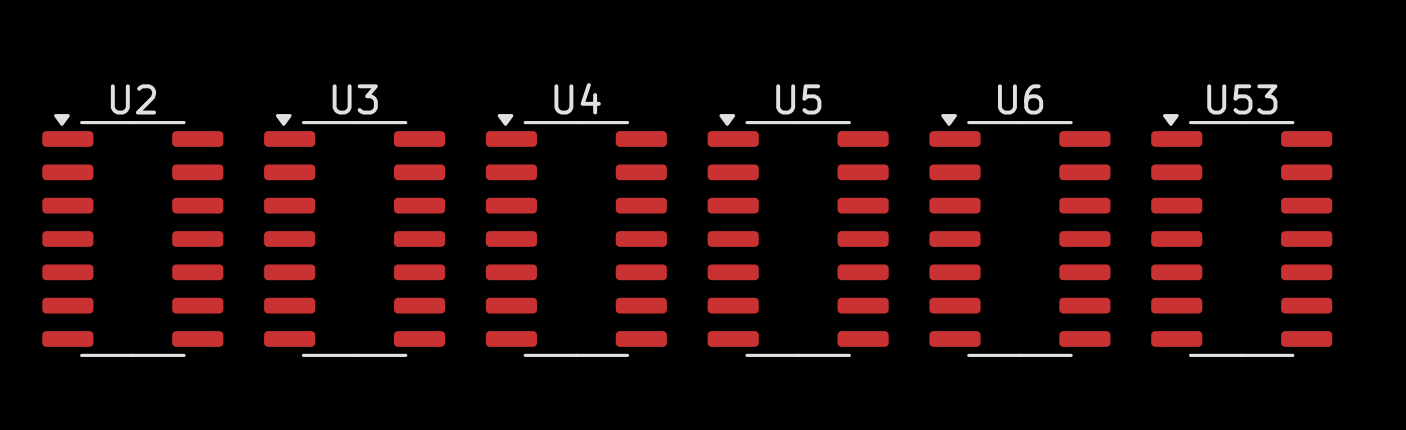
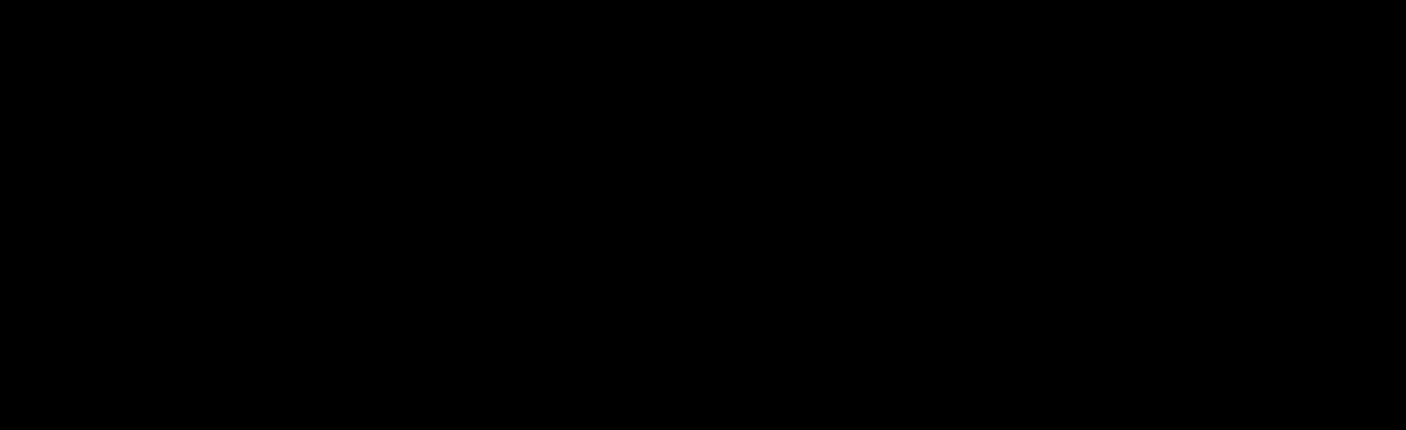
U2: (132, 235) -> none
U3: (354, 235) -> none
U4: (576, 235) -> none
U5: (798, 235) -> none
U6: (1019, 235) -> none
U53: (1241, 235) -> none

